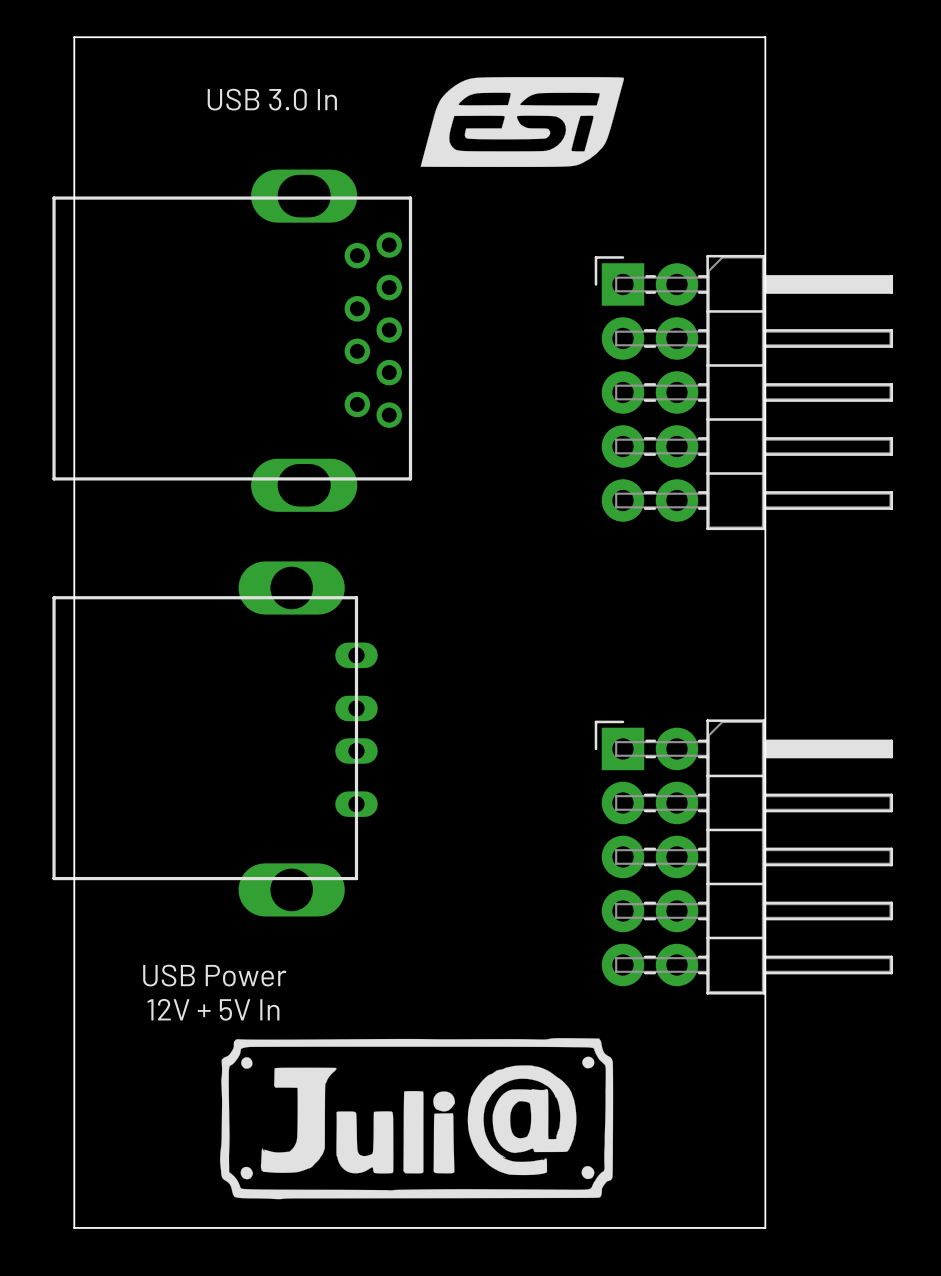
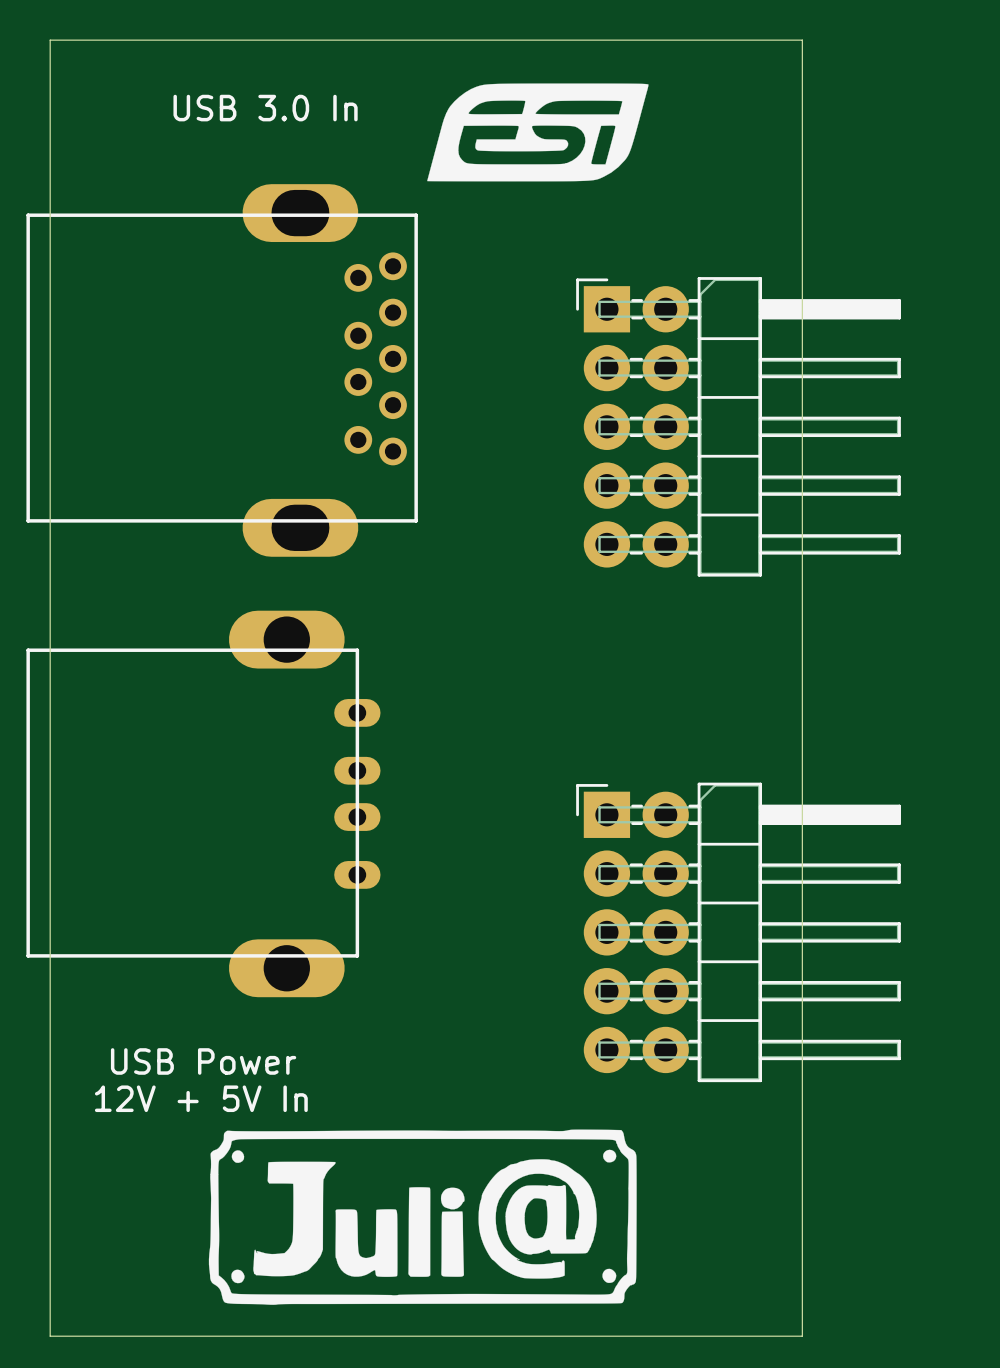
part position: (743, 392) -> (738, 426)
part position: (743, 856) -> (738, 932)

